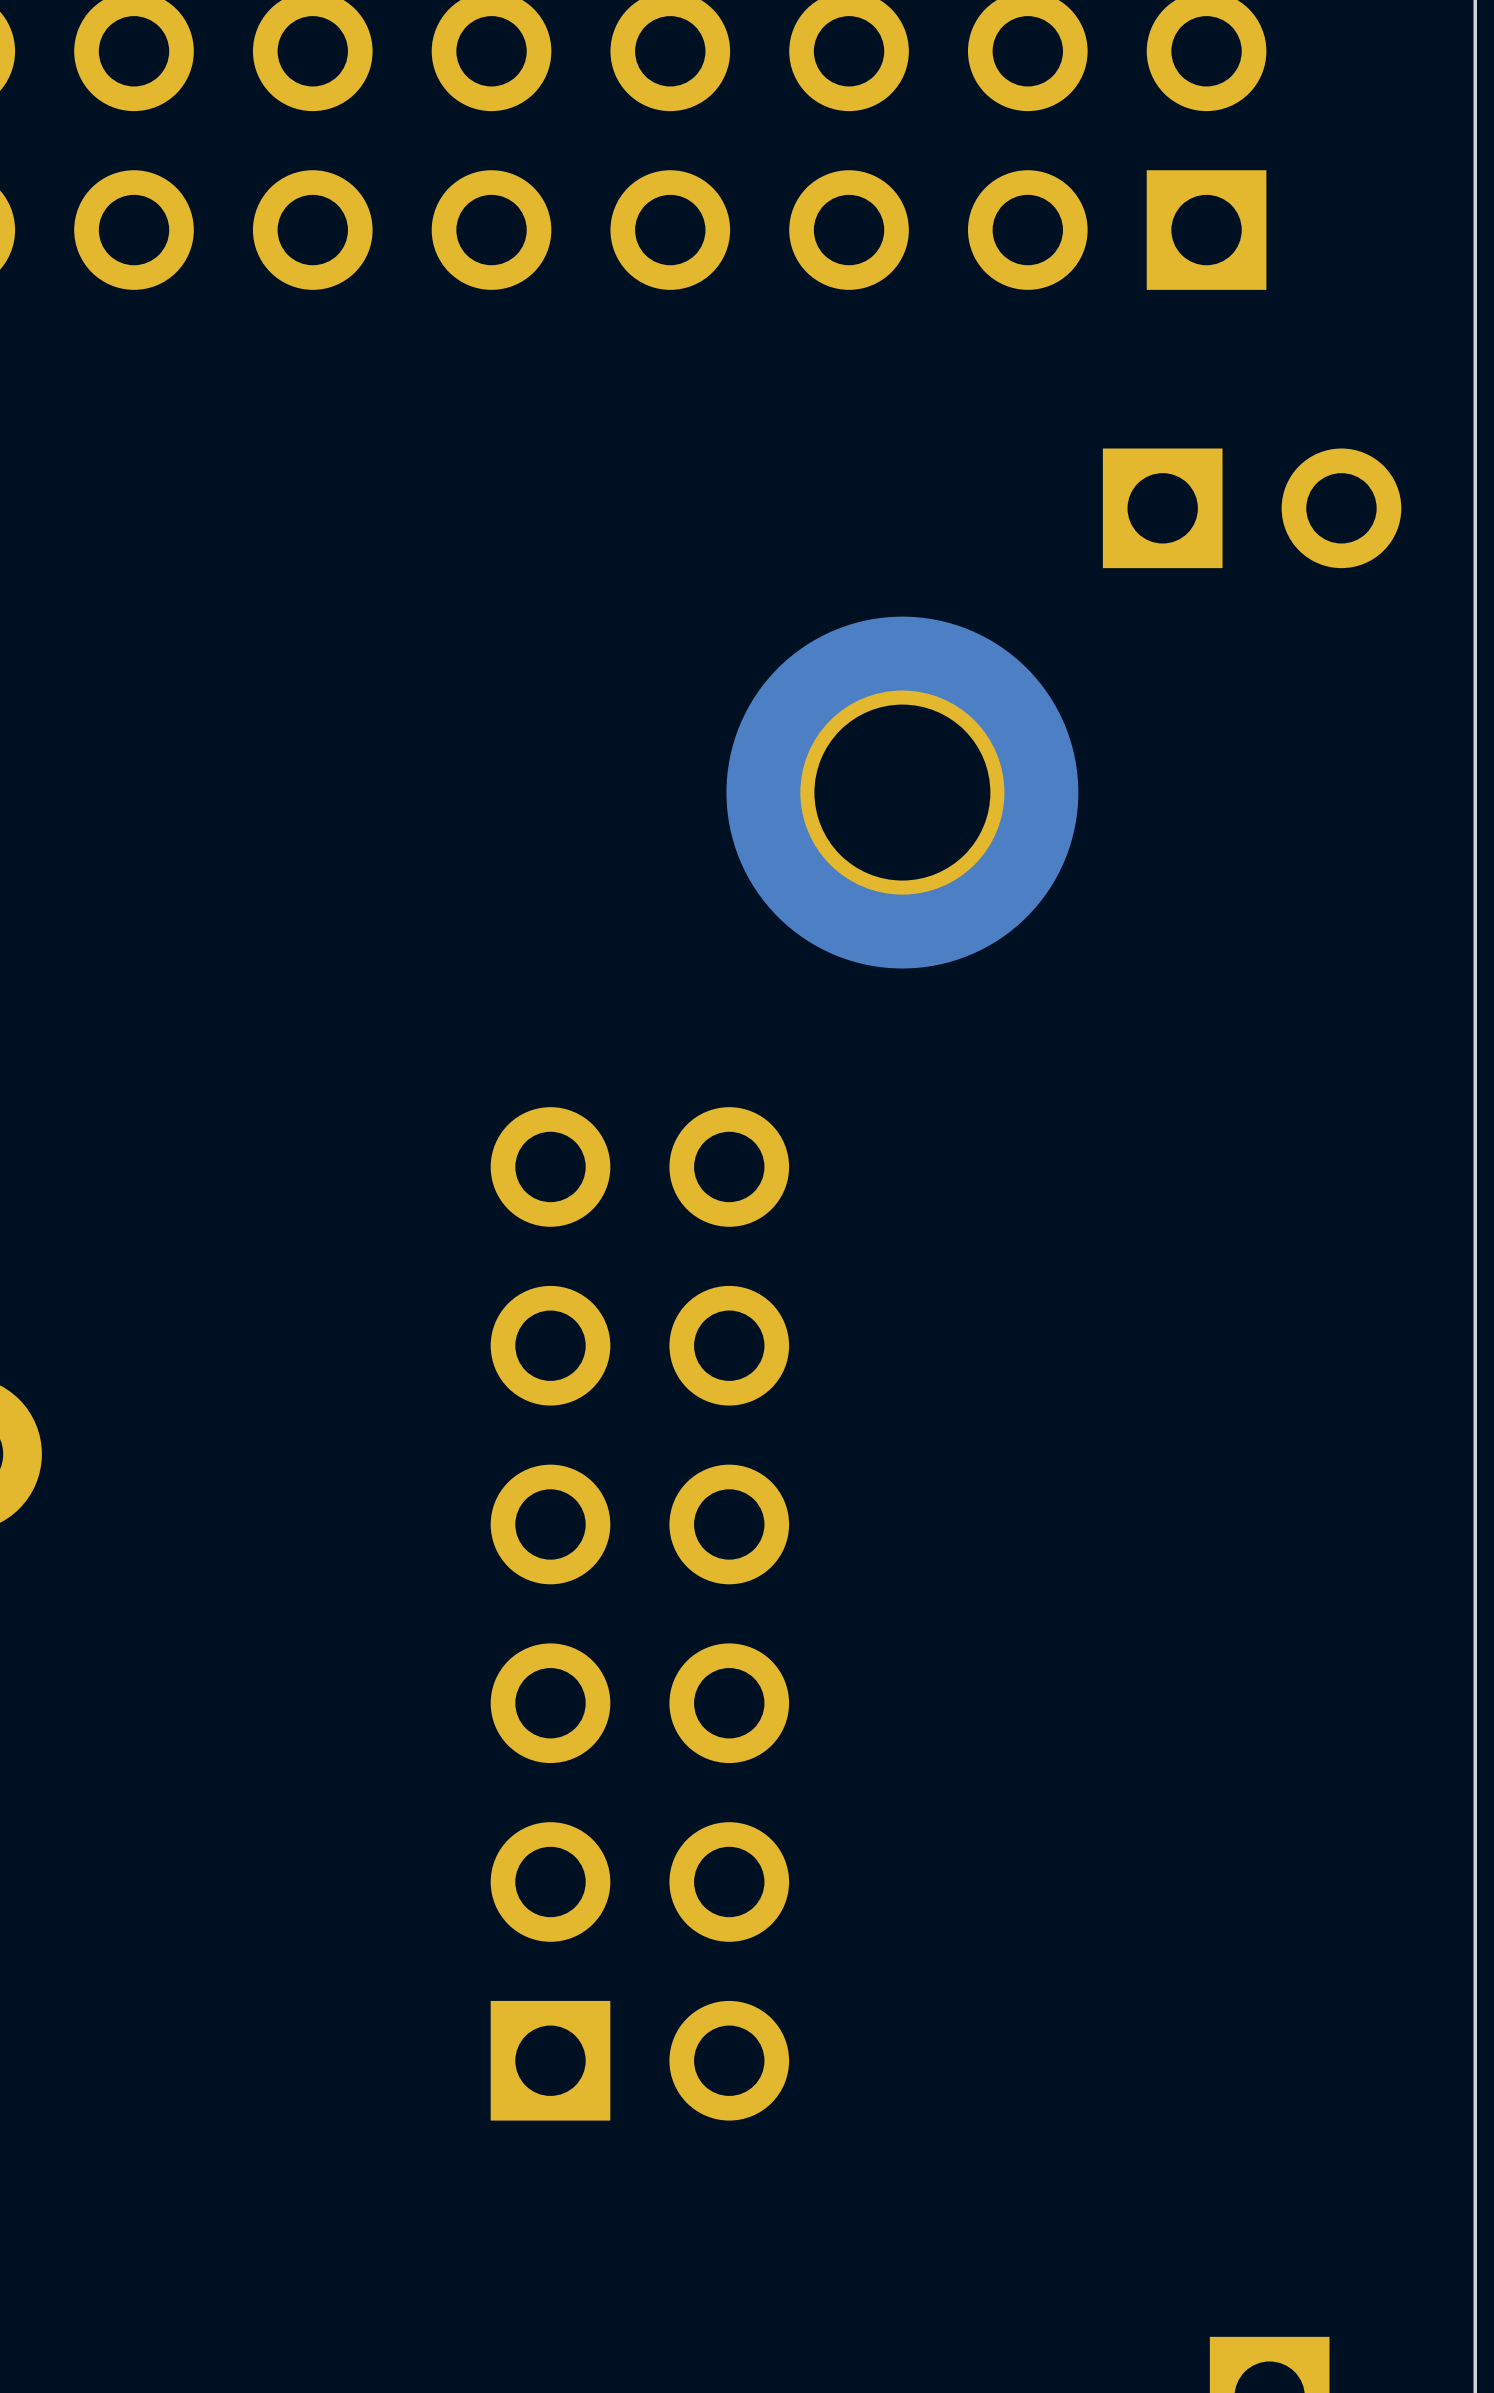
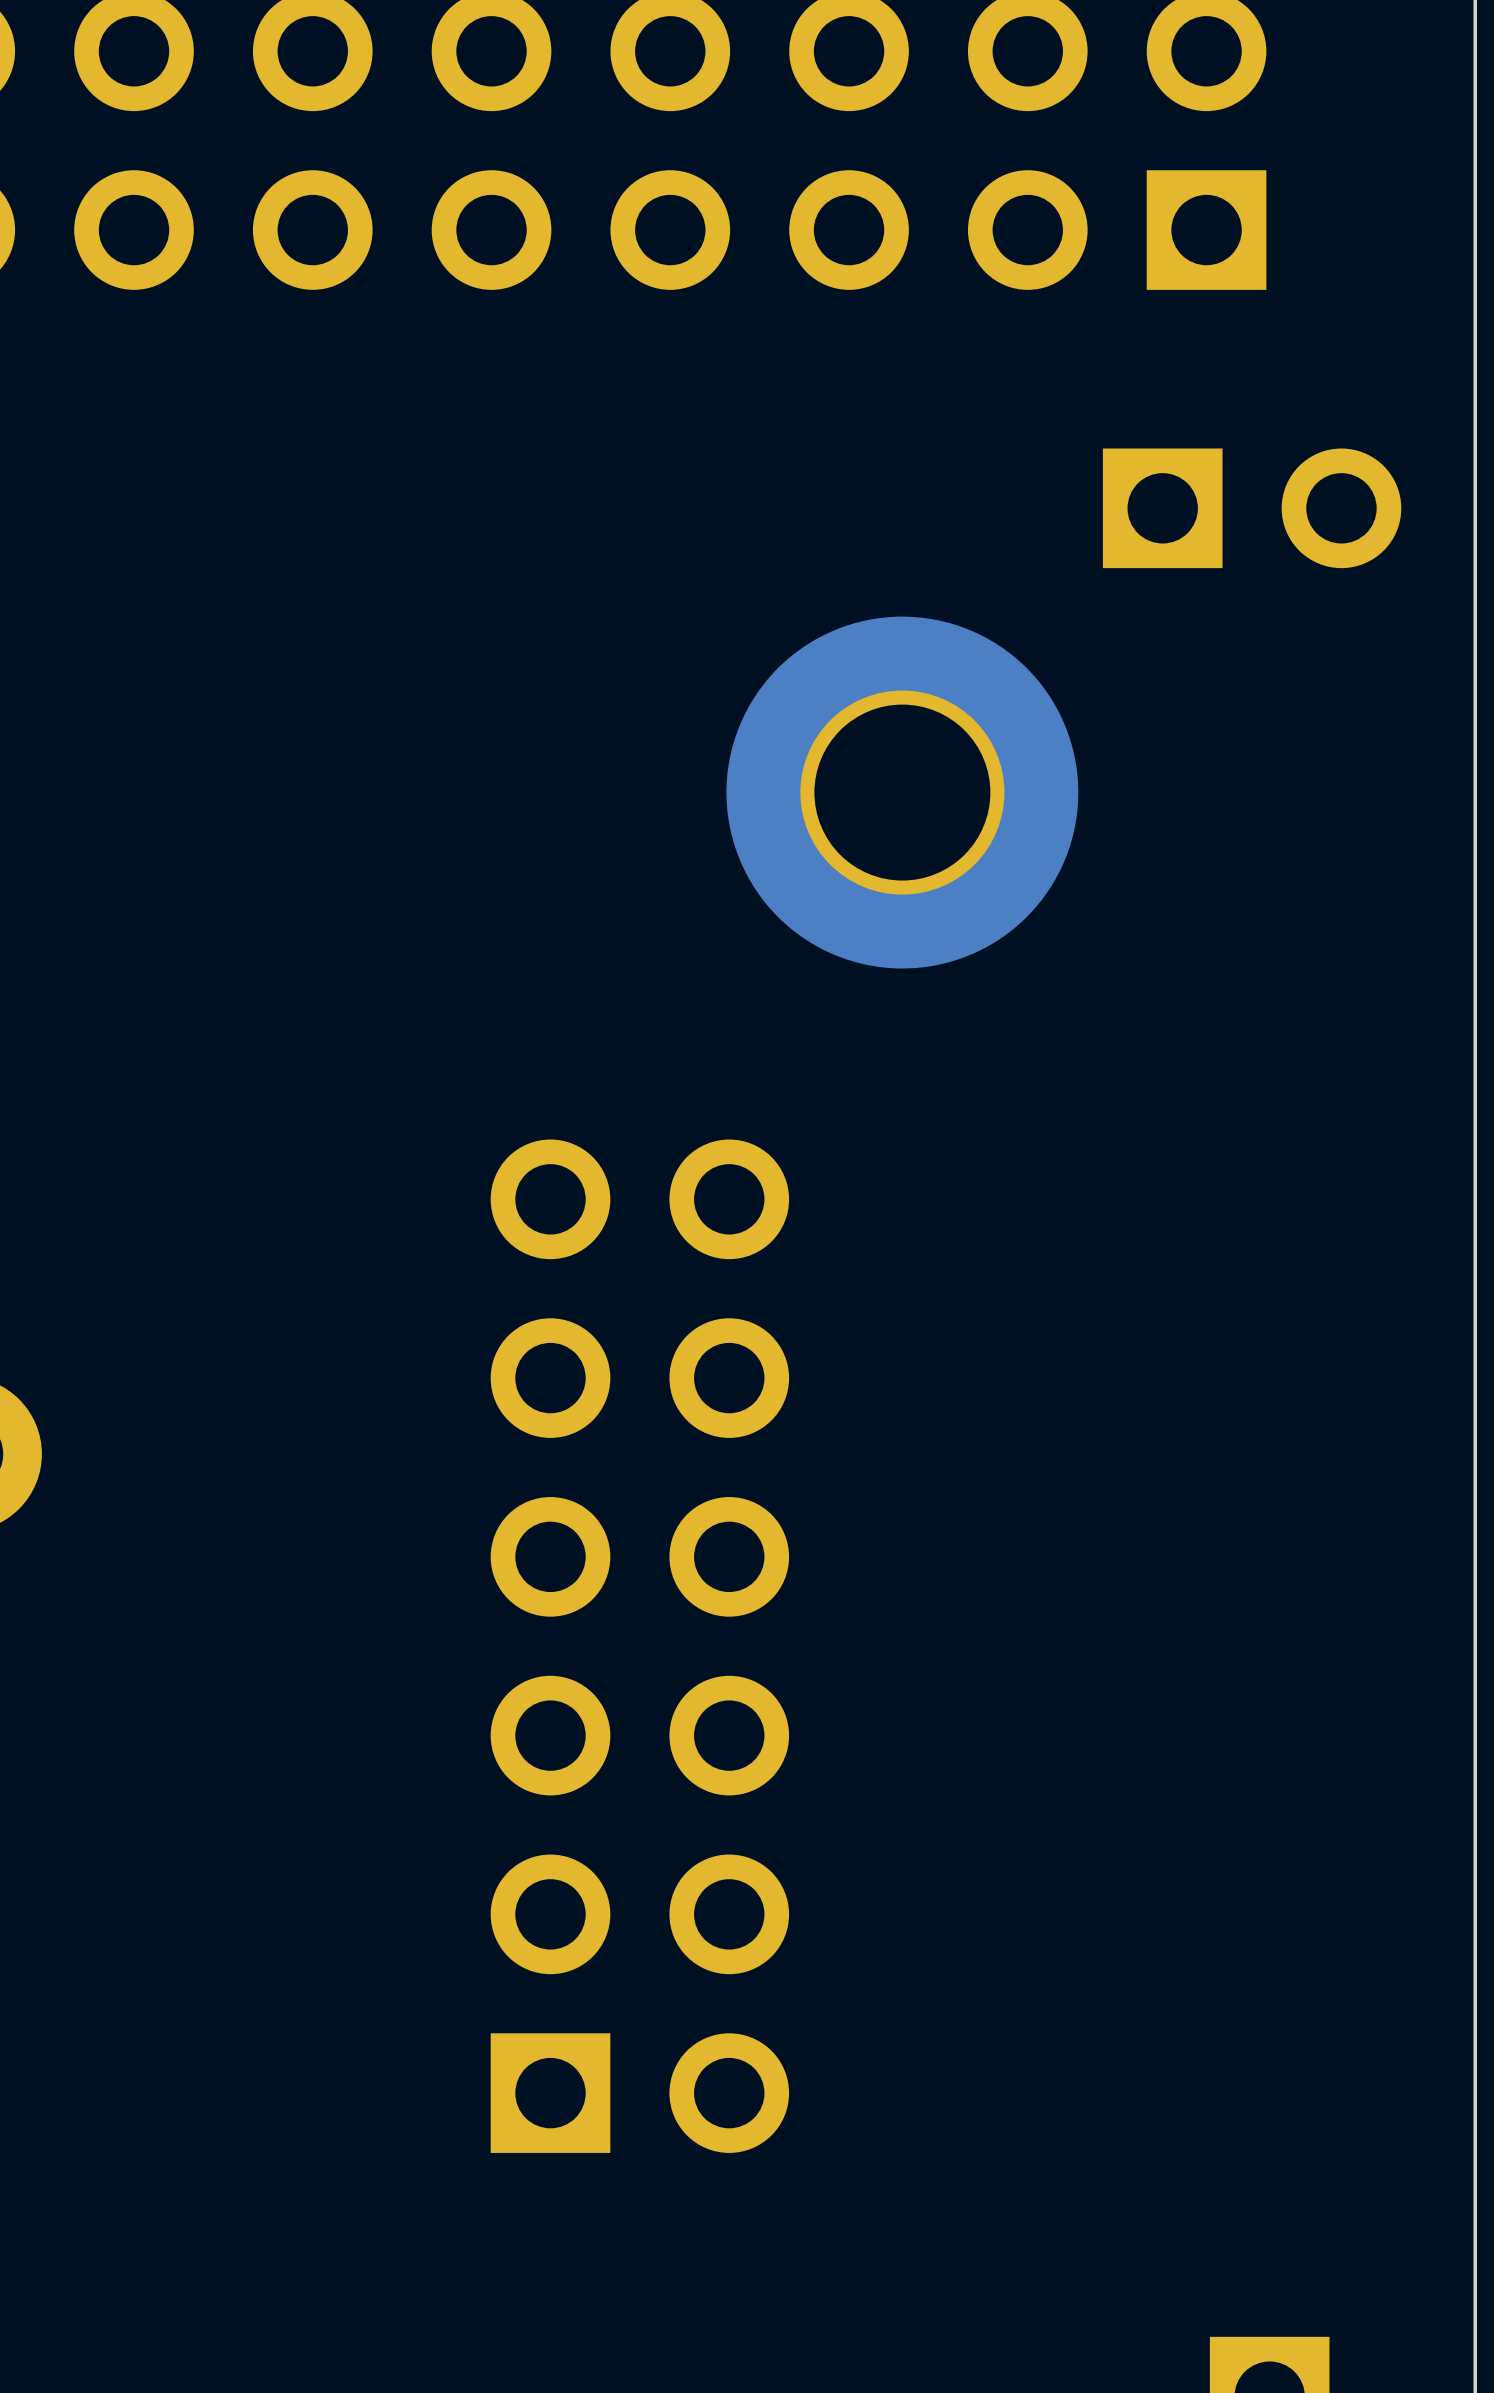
part position: (639, 1613) -> (639, 1646)

